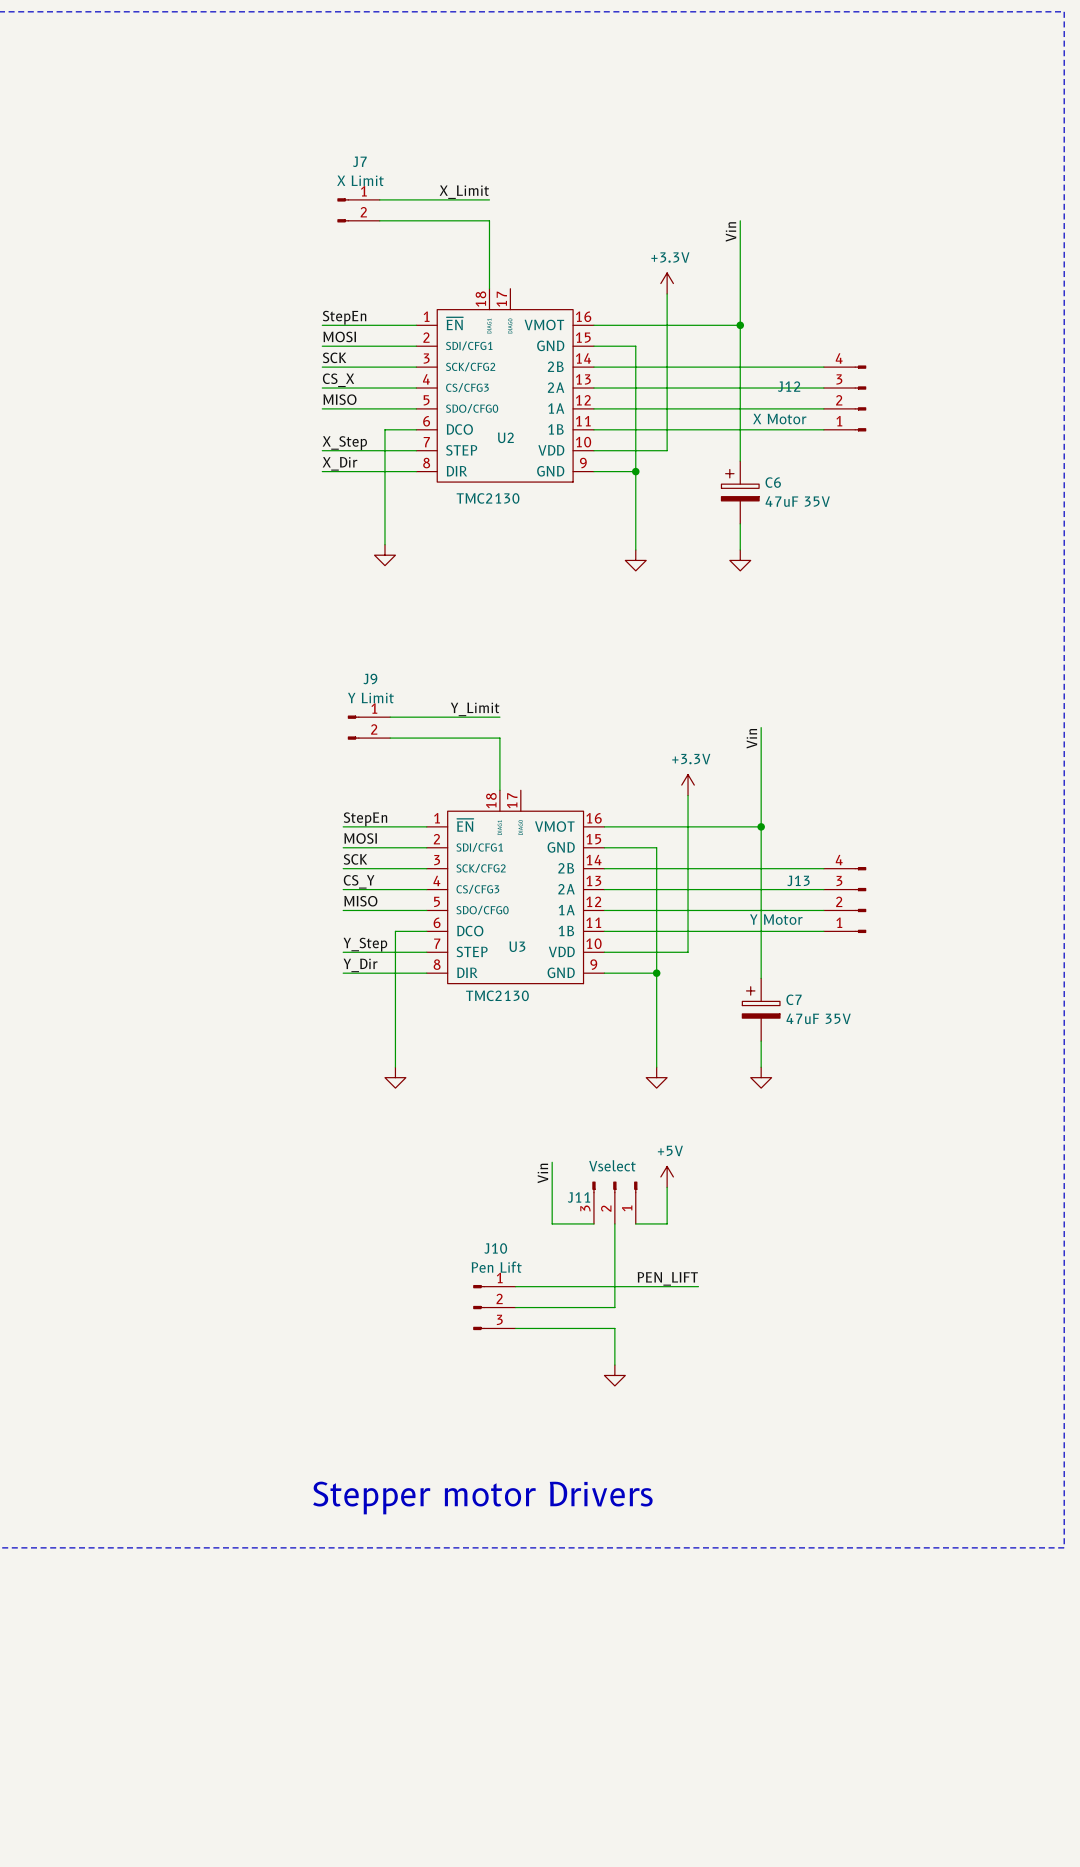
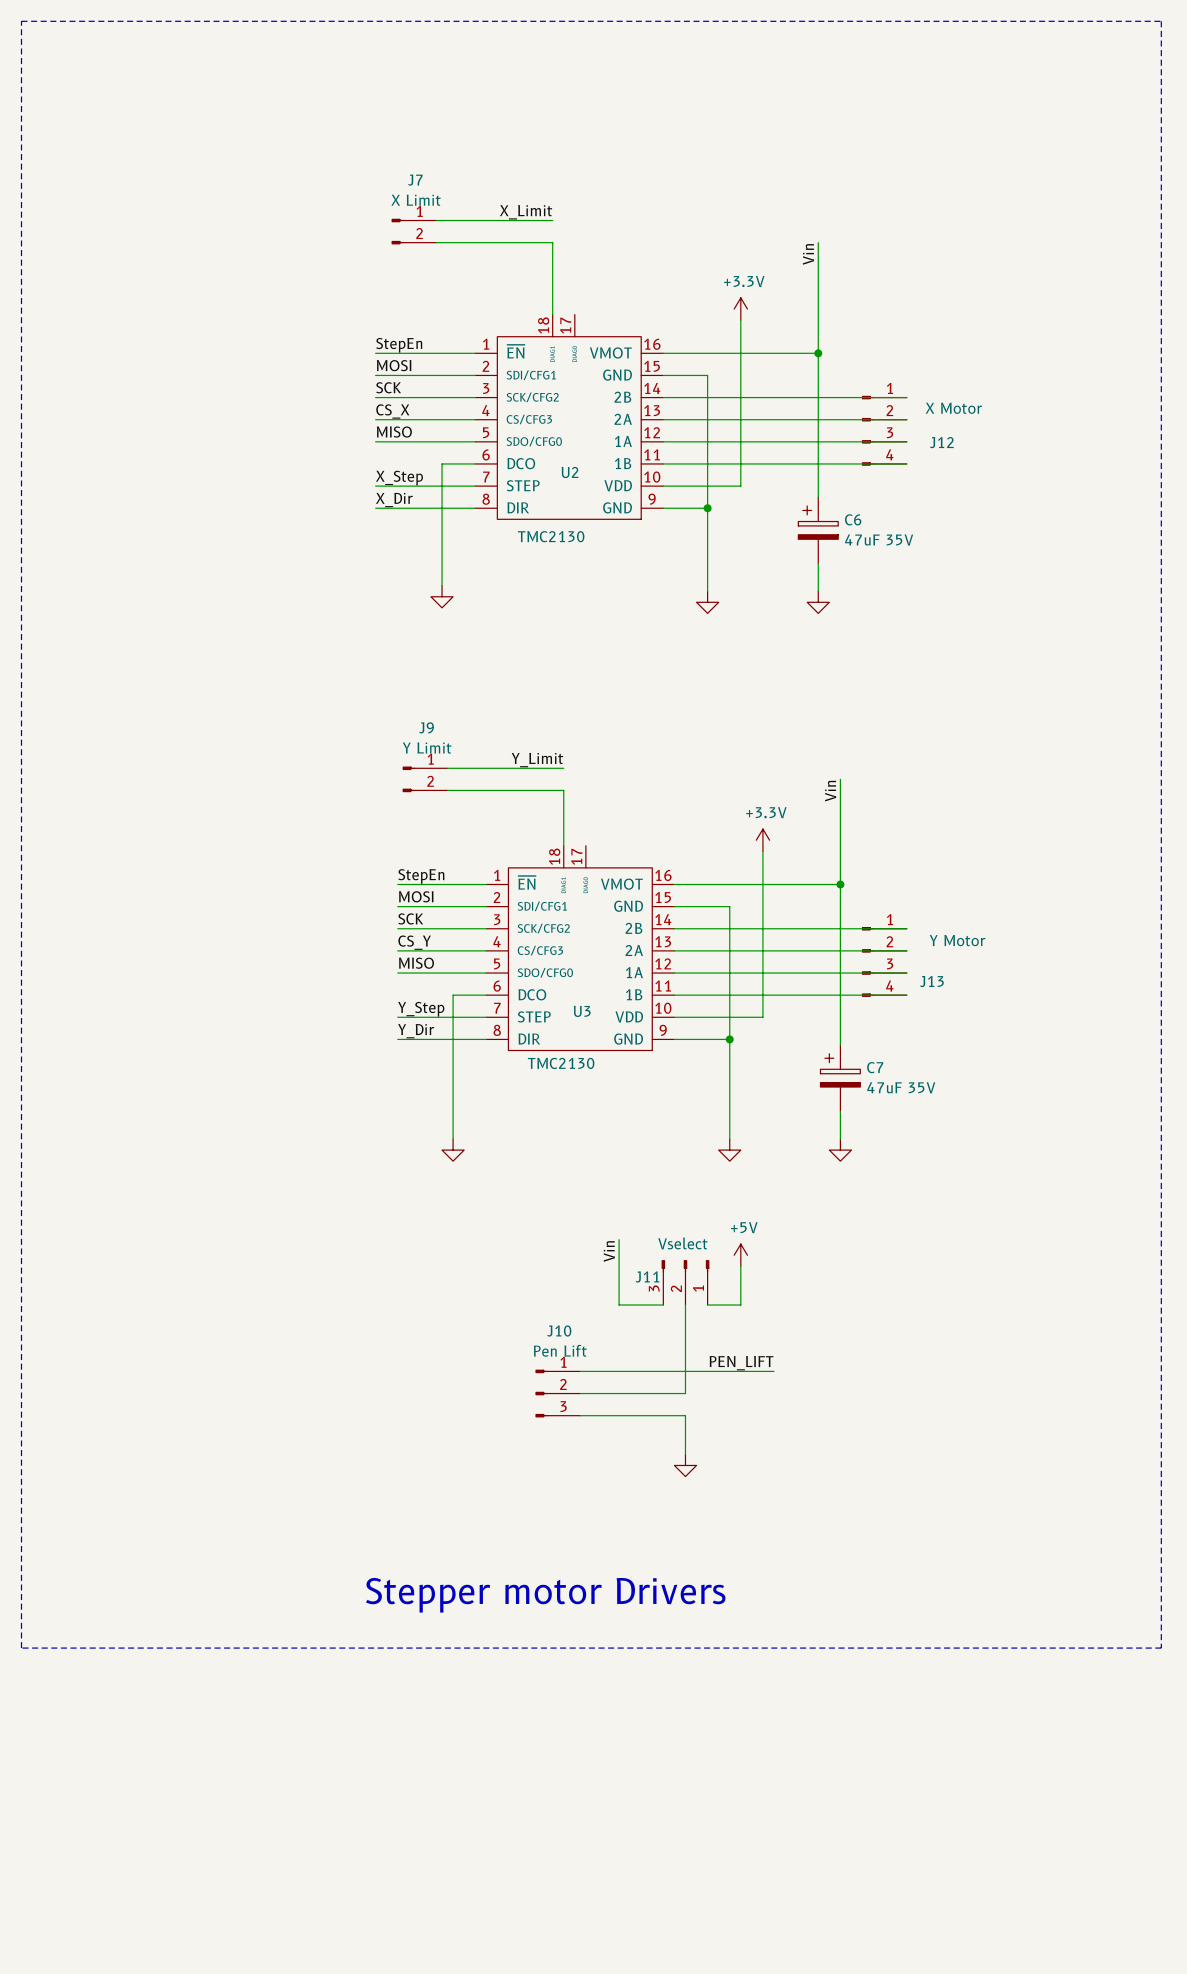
J12 position: (845, 398) -> (884, 430)
J12 rotation: 0° (860, 398) -> 180° (868, 430)
J13 position: (845, 900) -> (884, 961)
J13 rotation: 0° (860, 900) -> 180° (868, 961)

